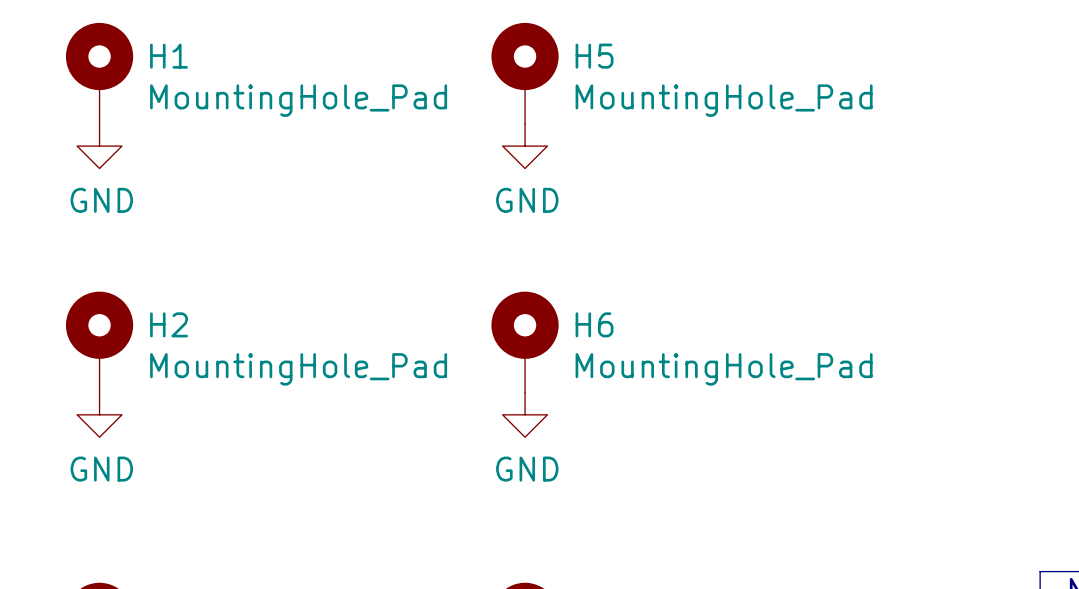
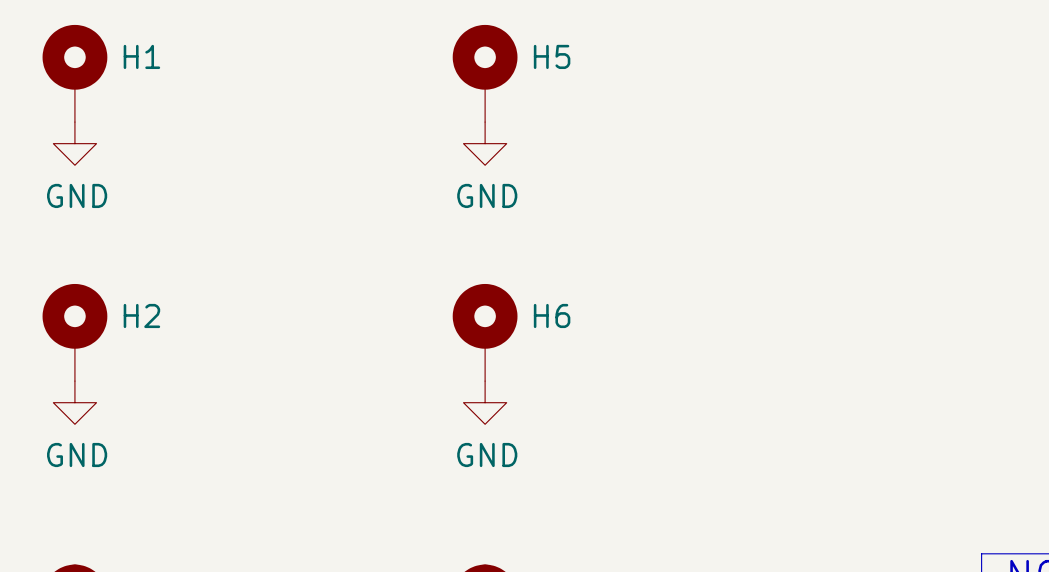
H1 value: MountingHole_Pad (298, 100) -> none
H5 value: MountingHole_Pad (724, 100) -> none
H2 value: MountingHole_Pad (298, 369) -> none
H6 value: MountingHole_Pad (724, 369) -> none

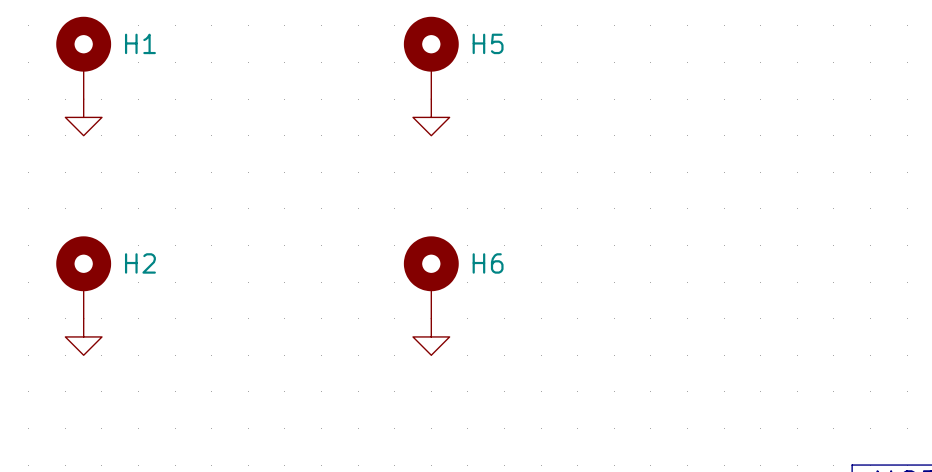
power symbol text: GND (77, 195) -> none
power symbol text: GND (487, 195) -> none
power symbol text: GND (77, 455) -> none
power symbol text: GND (487, 455) -> none

